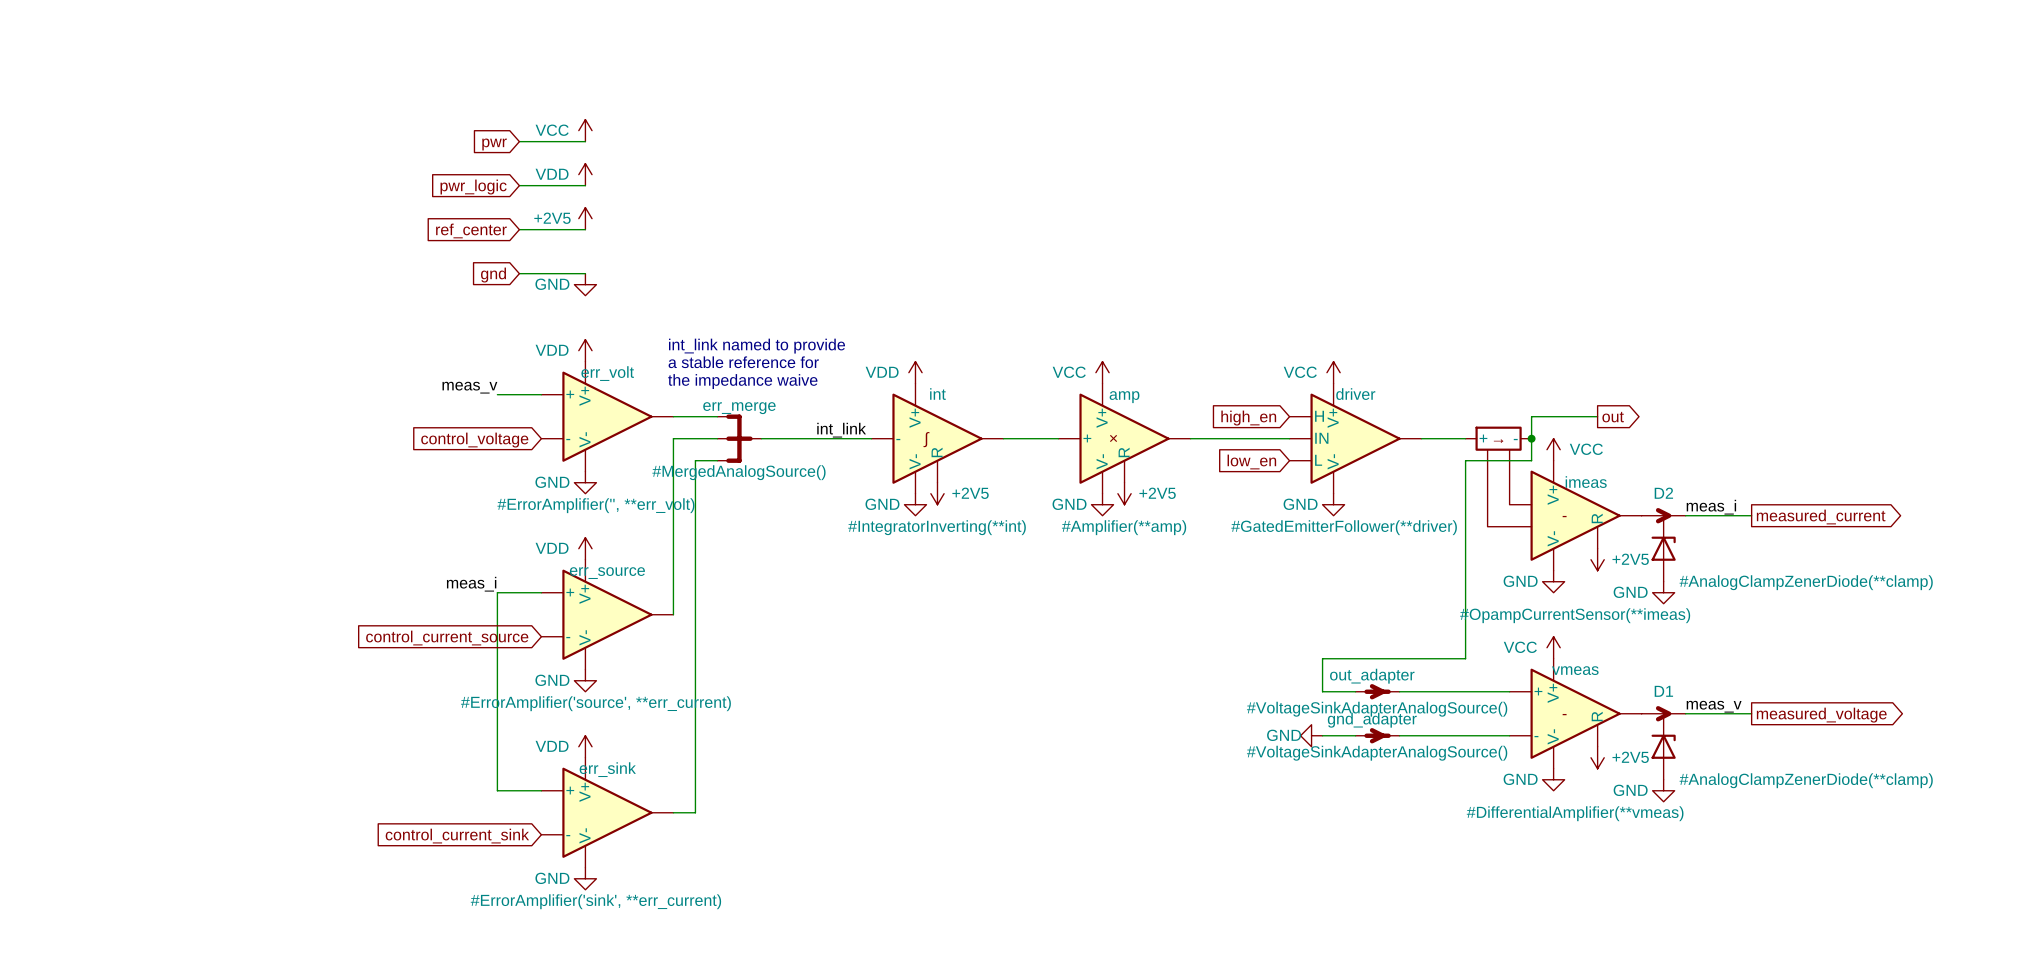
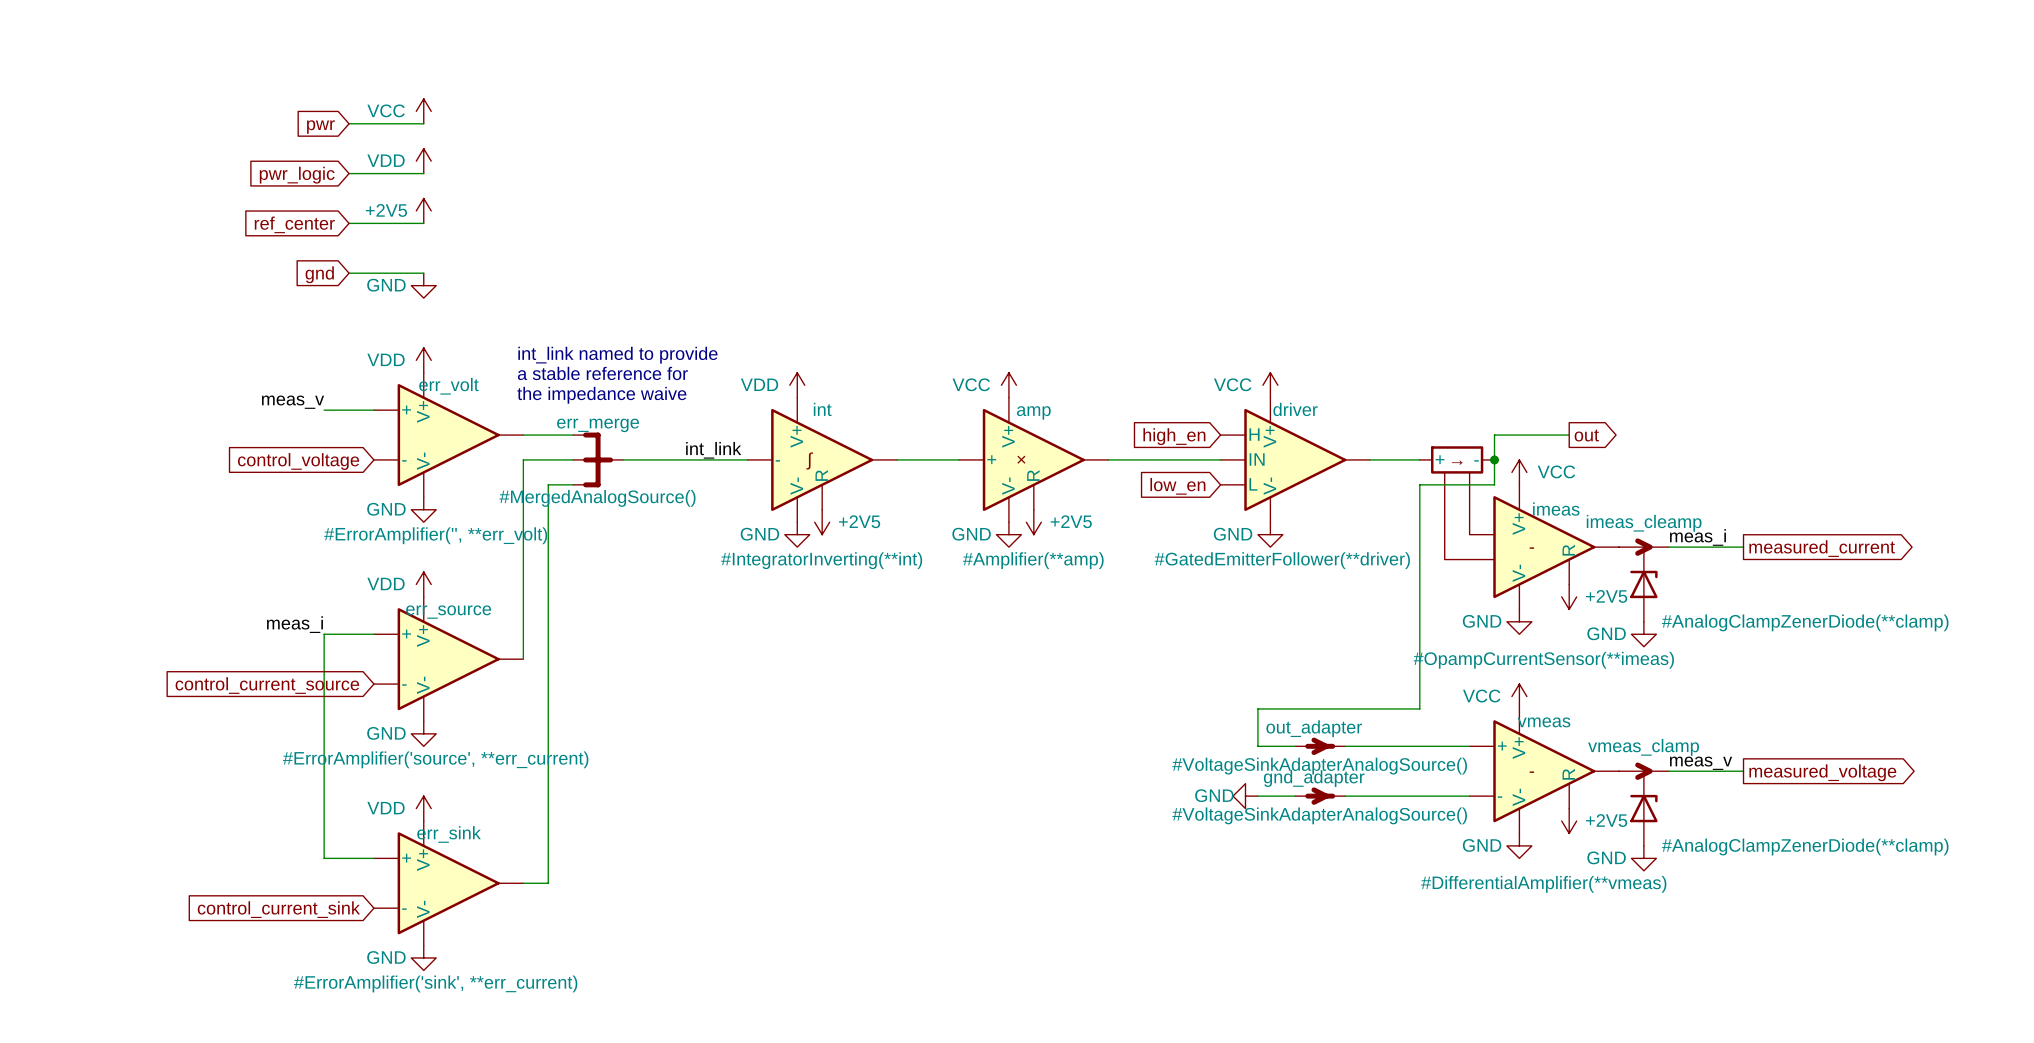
D2 name: D2 (1663, 493) -> imeas_cleamp (1644, 523)
D1 name: D1 (1663, 691) -> vmeas_clamp (1643, 747)

